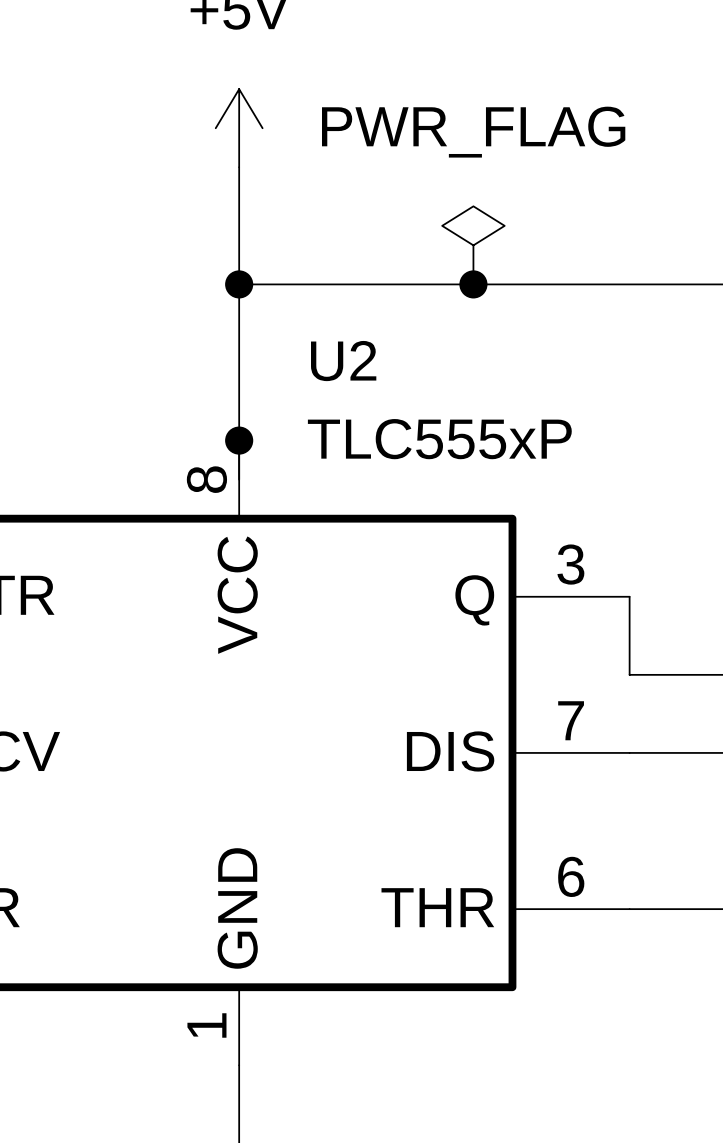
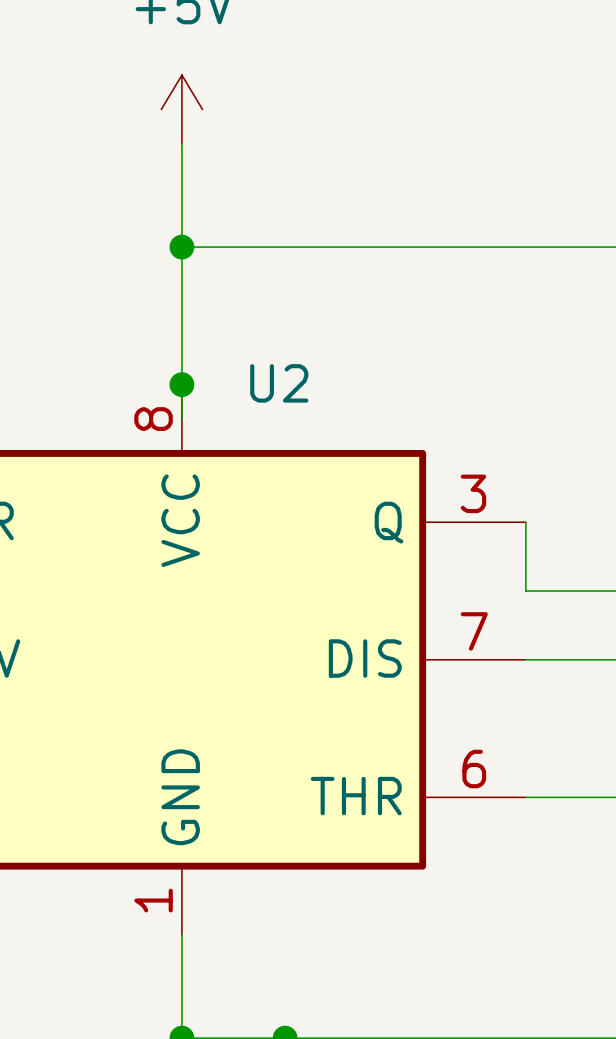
power symbol: PWR_FLAG (473, 245) -> none
junction: (473, 284) -> none
U2 name position: U2 (343, 361) -> U2 (279, 383)
U2 value: TLC555xP (439, 439) -> none

